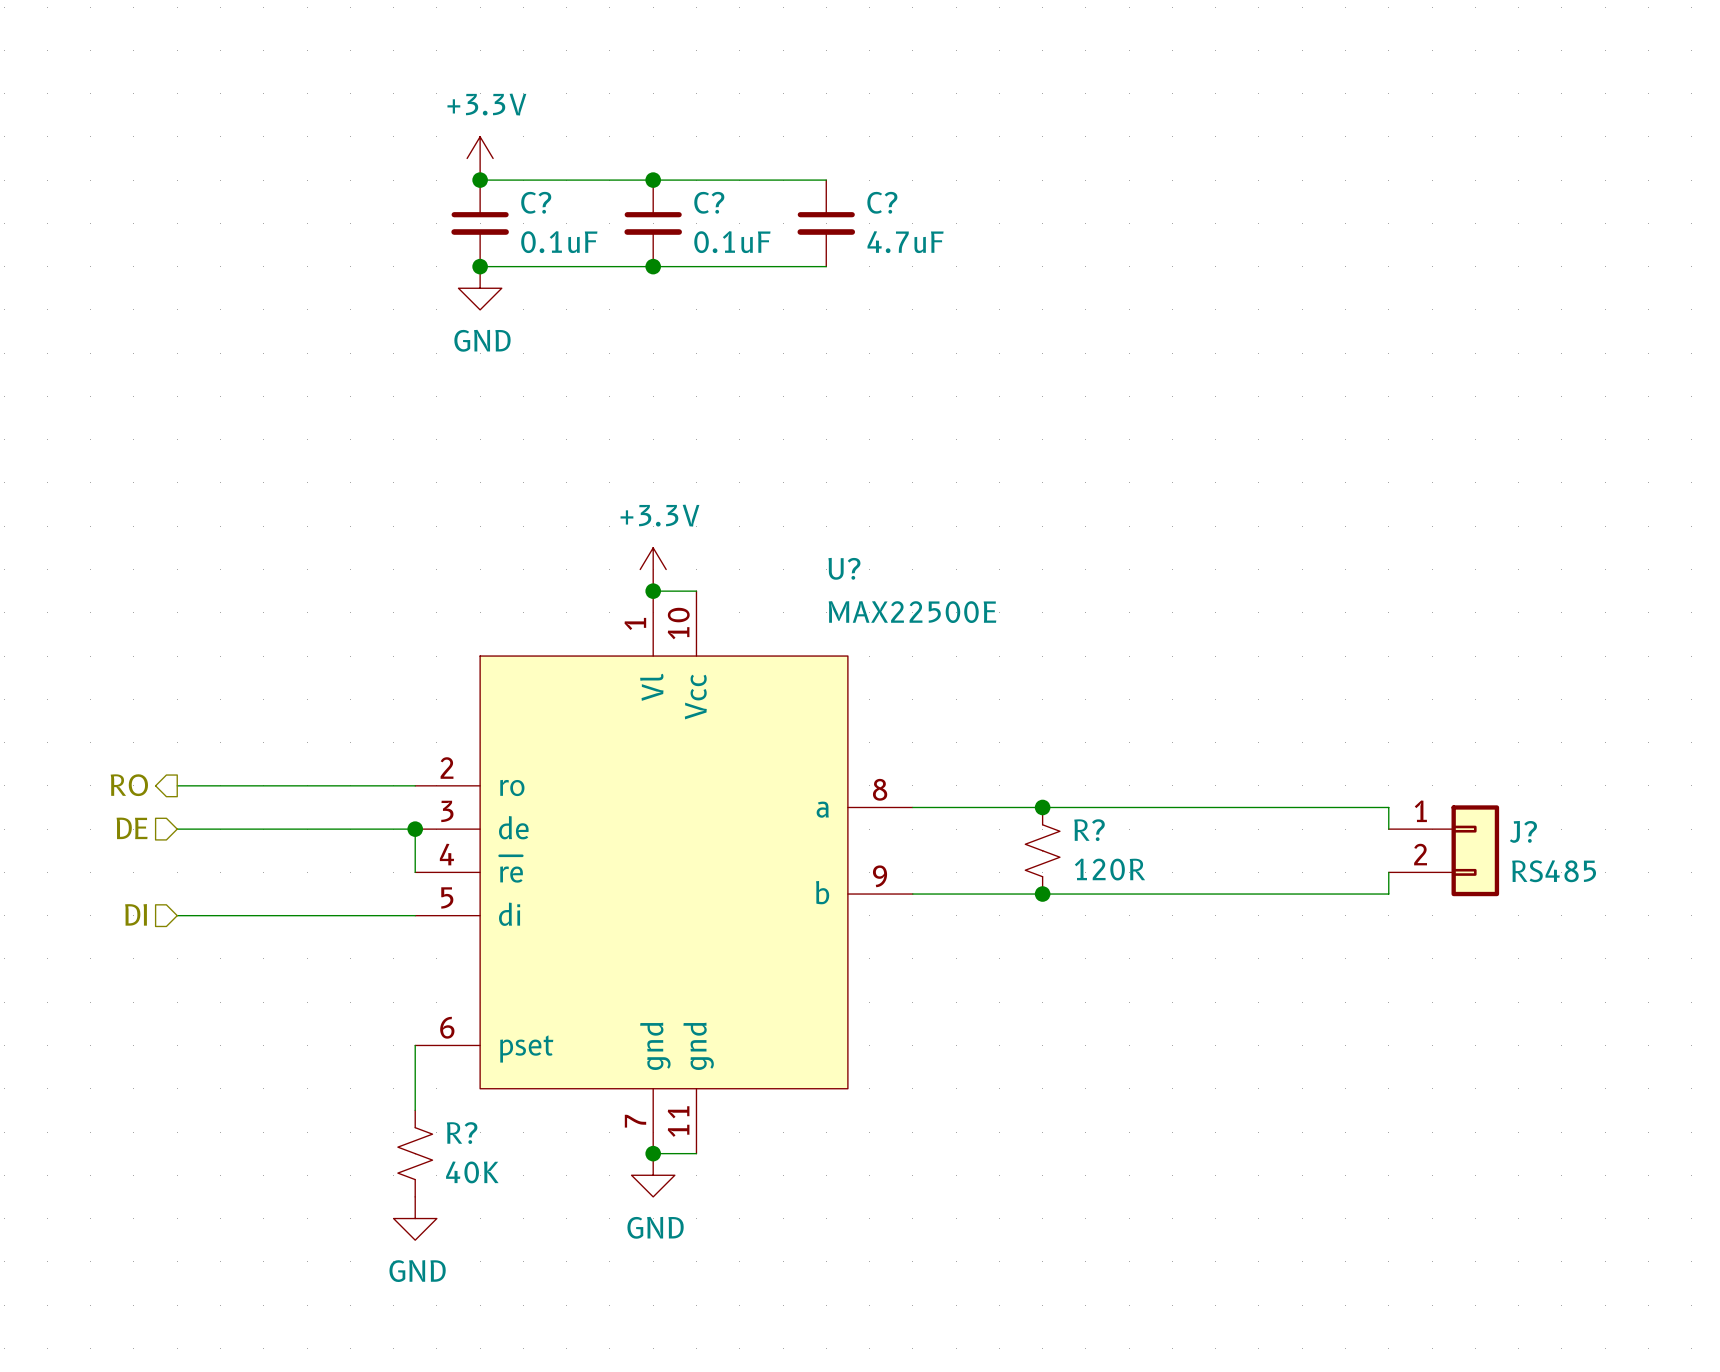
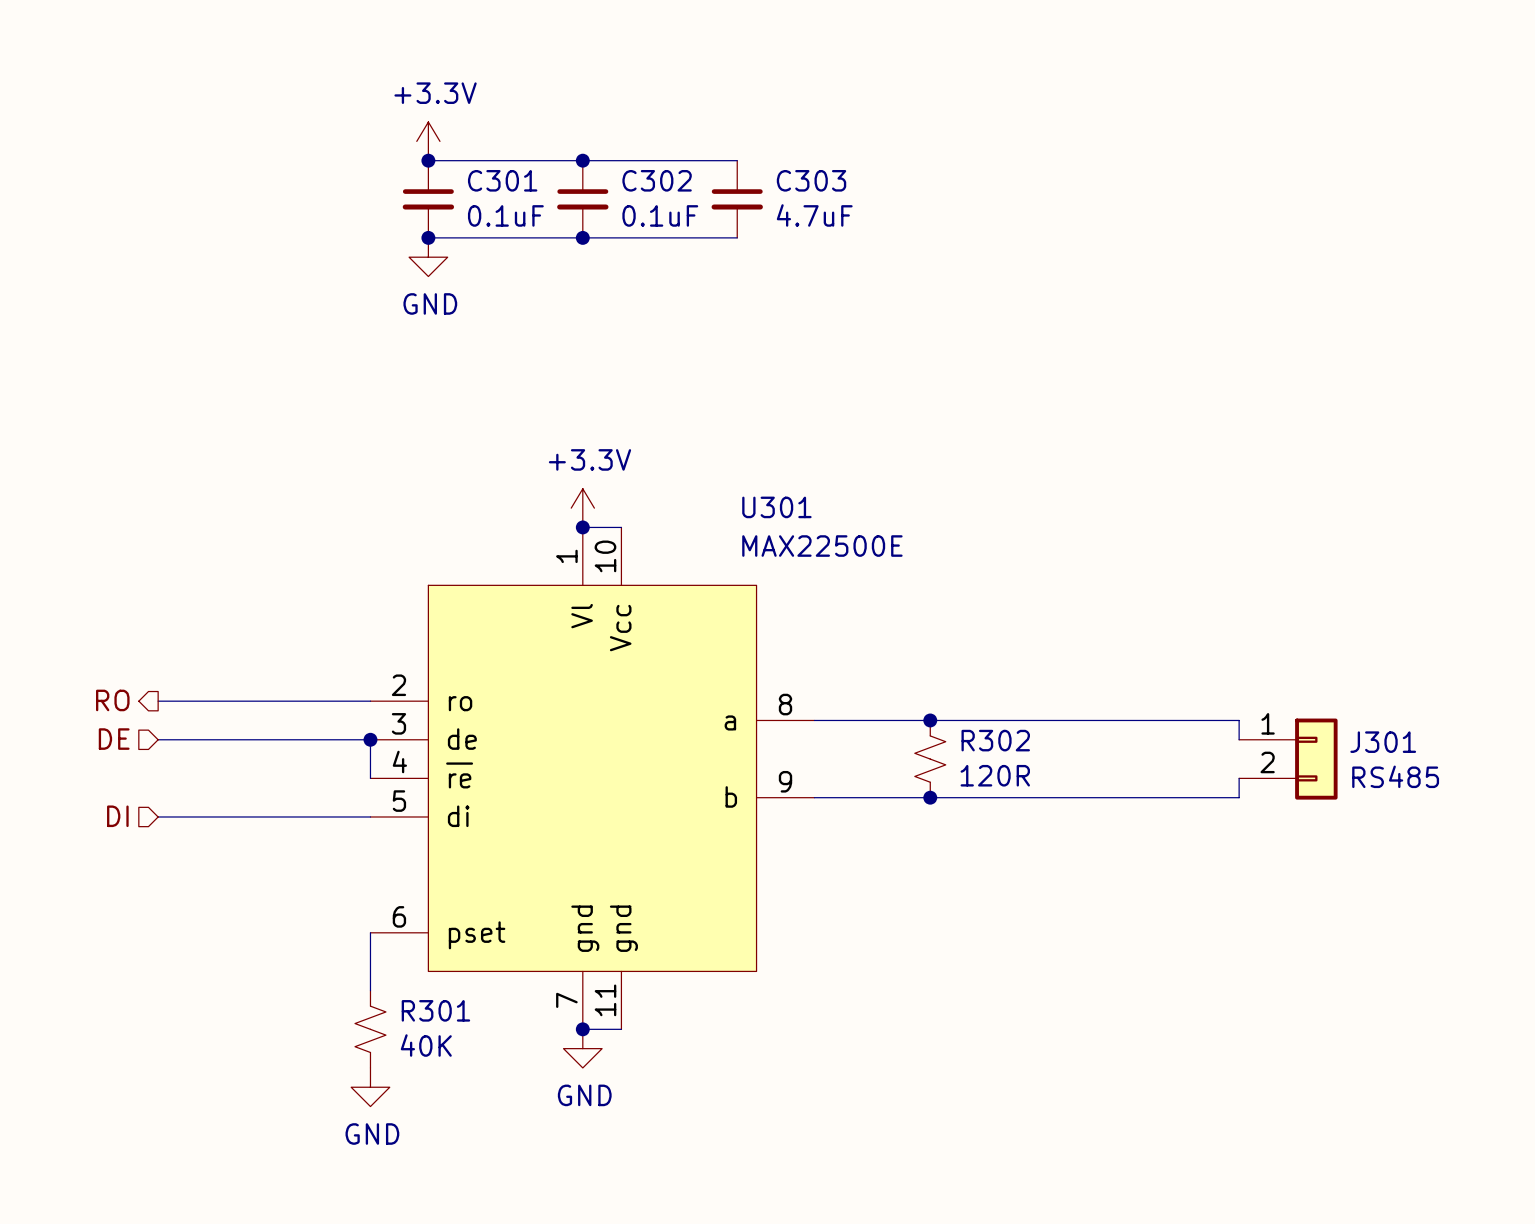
C? name: C? (536, 202) -> C301 (502, 180)
C? name: C? (709, 202) -> C302 (657, 180)
C? name: C? (882, 202) -> C303 (811, 180)
U? name: U? (844, 568) -> U301 (776, 507)
R? name: R? (1089, 830) -> R302 (995, 740)
J? name: J? (1523, 831) -> J301 (1383, 742)
R? name: R? (462, 1133) -> R301 (435, 1010)

